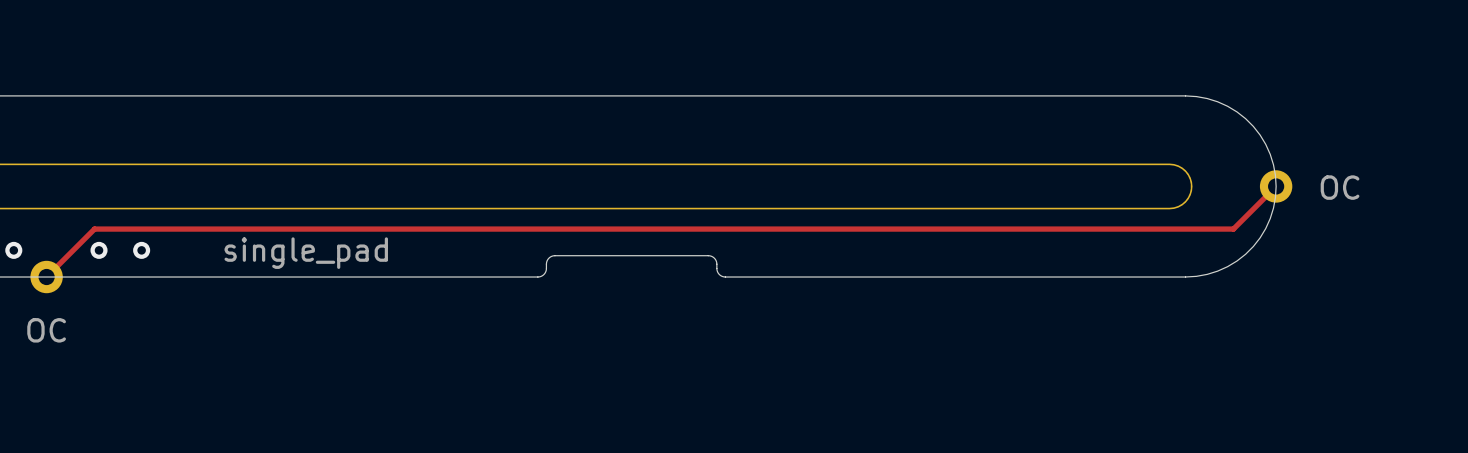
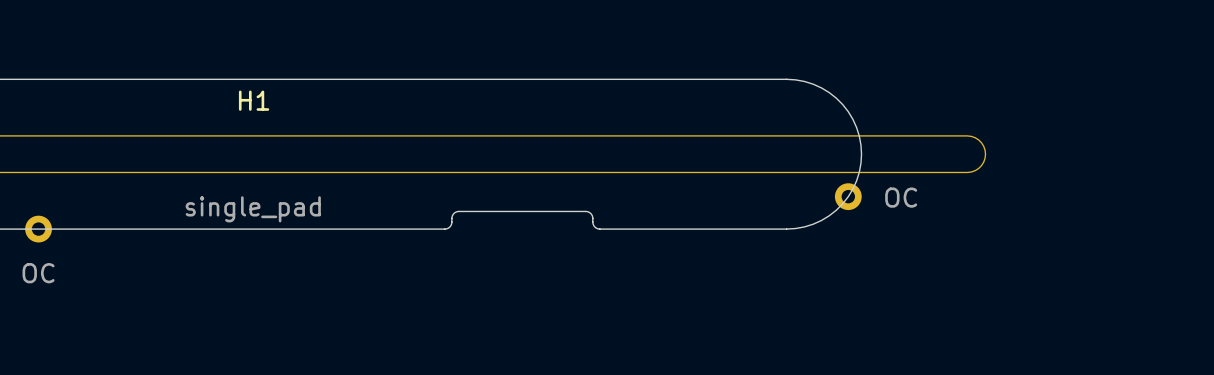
board edge: (951, 95) (1185, 95) (1207, 98) (1227, 106) (1253, 126) (1270, 154) (1276, 186) (1270, 218) (1253, 246) (1237, 260) (1207, 274) (1185, 277) (951, 277) -> (786, 79) (804, 81) (821, 87) (842, 104) (856, 127) (861, 154) (856, 180) (842, 203) (829, 215) (813, 224) (786, 229)
H1 name: none -> H1 (254, 100)
top track: (1276, 186) (1233, 229) (94, 229) (46, 277) -> none
part position: (1276, 186) -> (848, 196)
via: (13, 250) -> none
via: (99, 250) -> none
via: (141, 250) -> none

